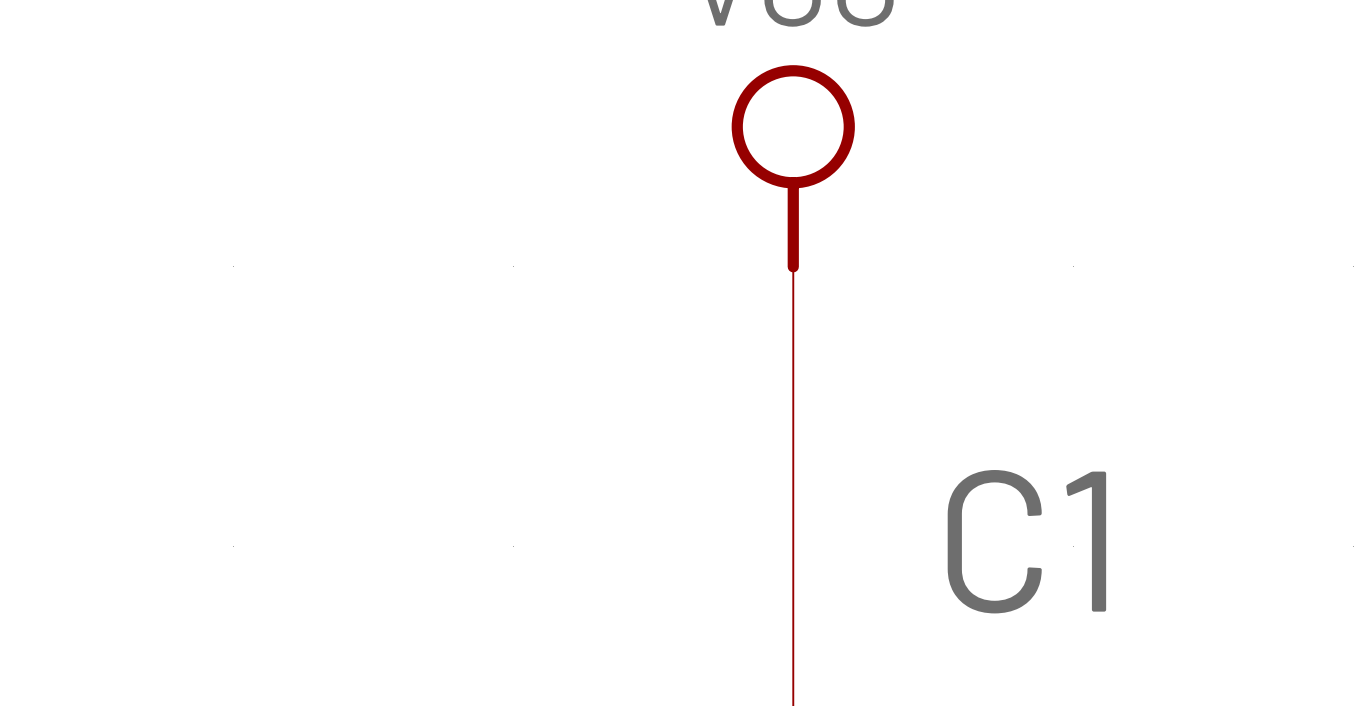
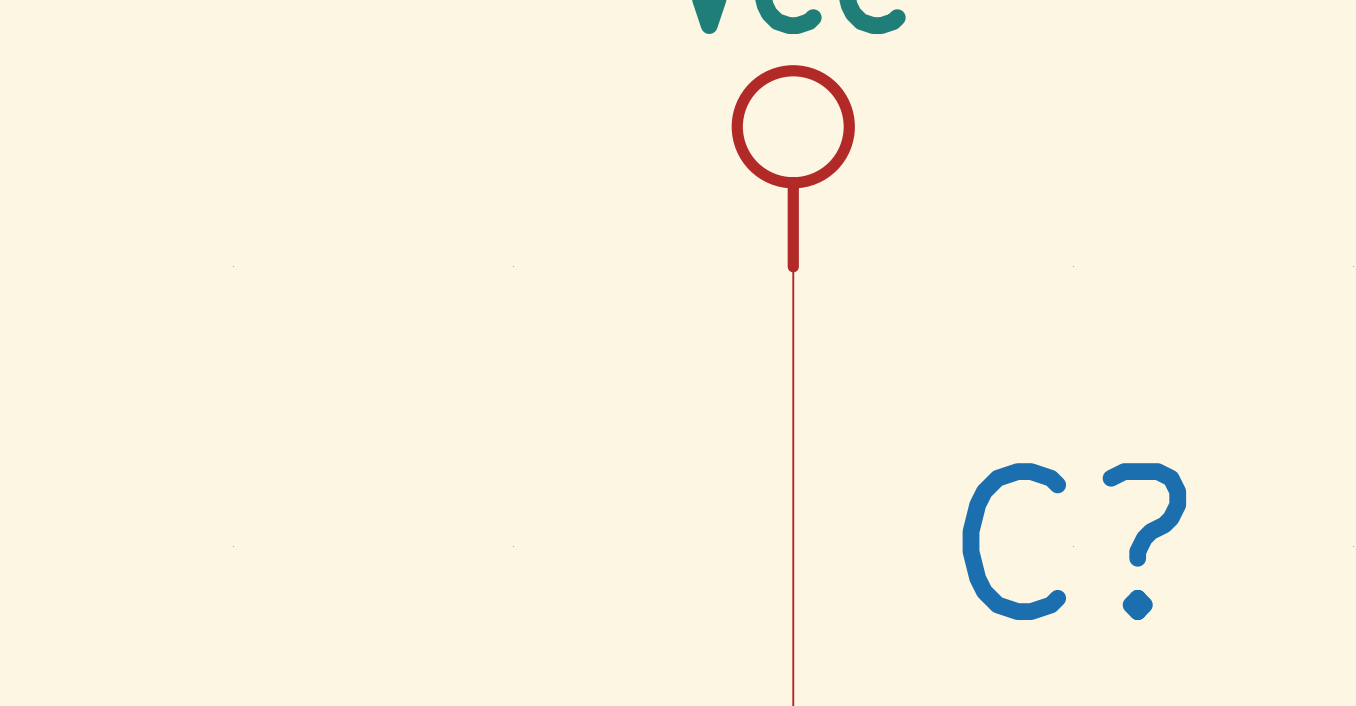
C1 name: C1 (1026, 541) -> C? (1074, 541)

